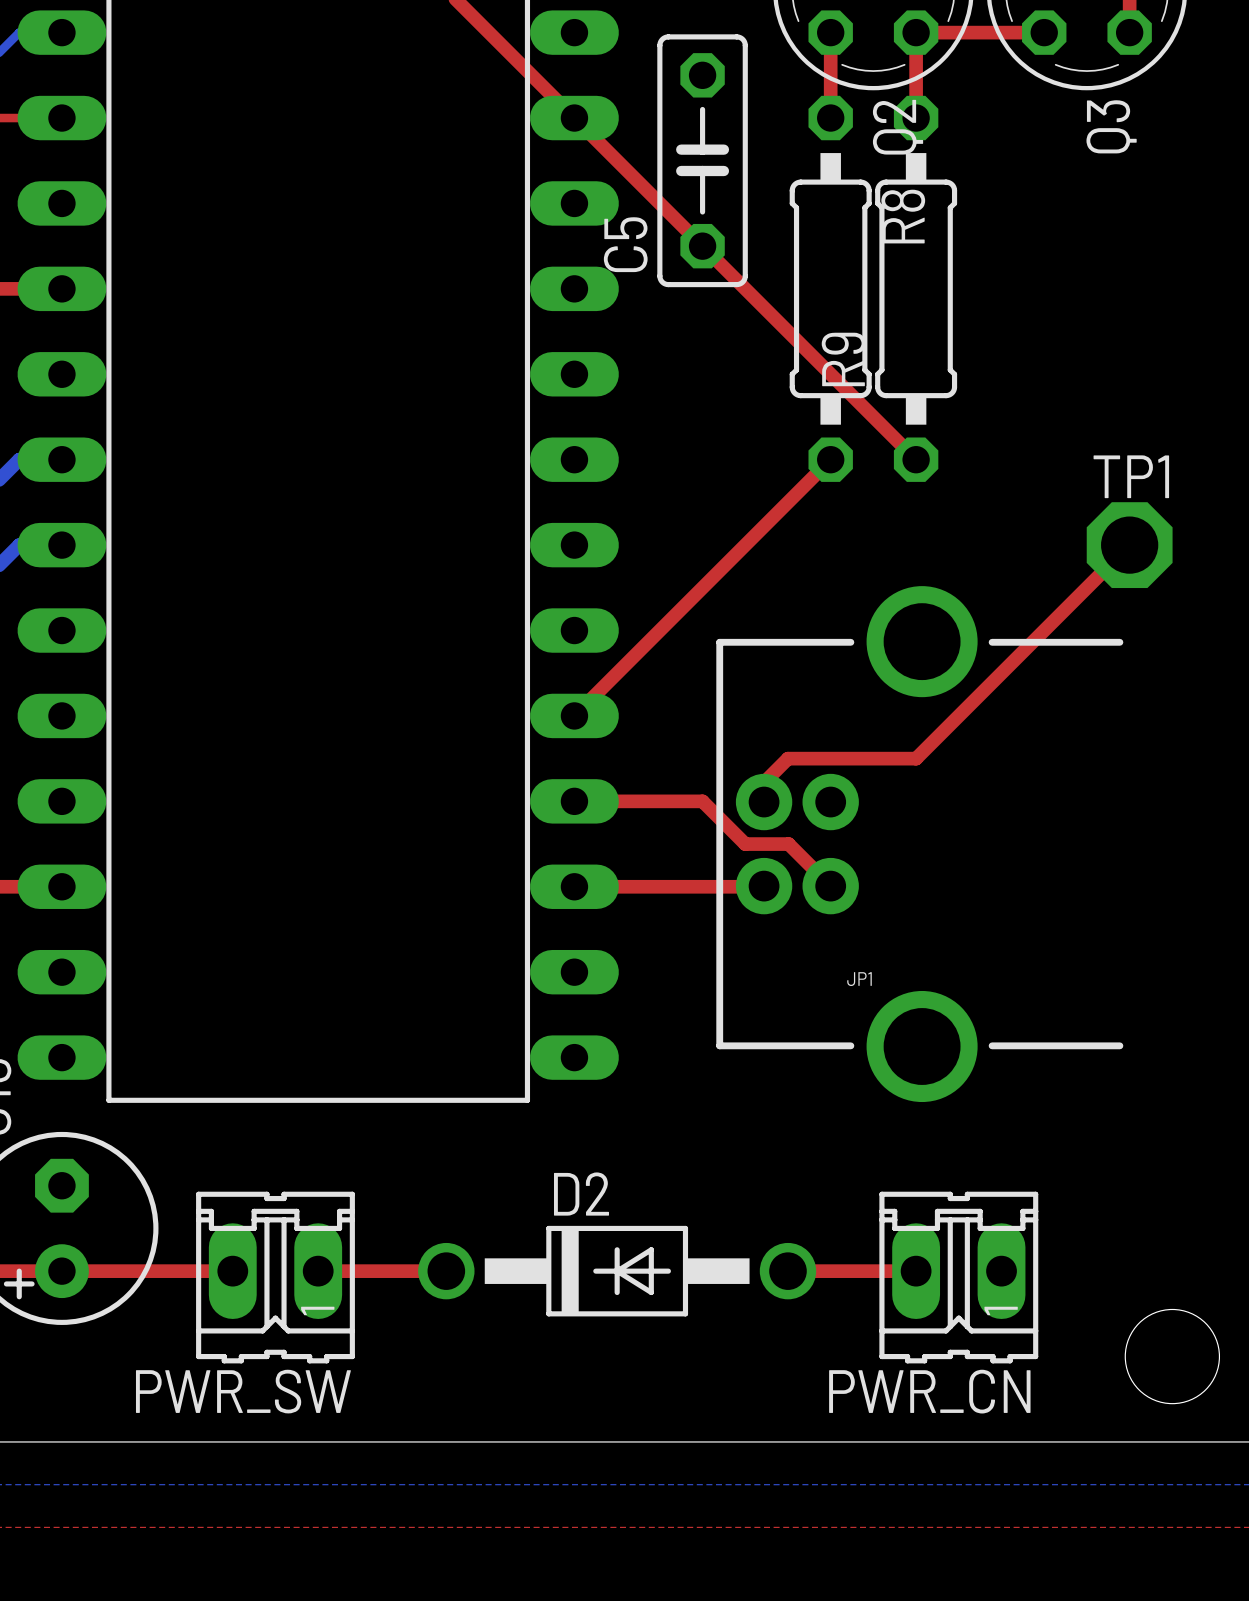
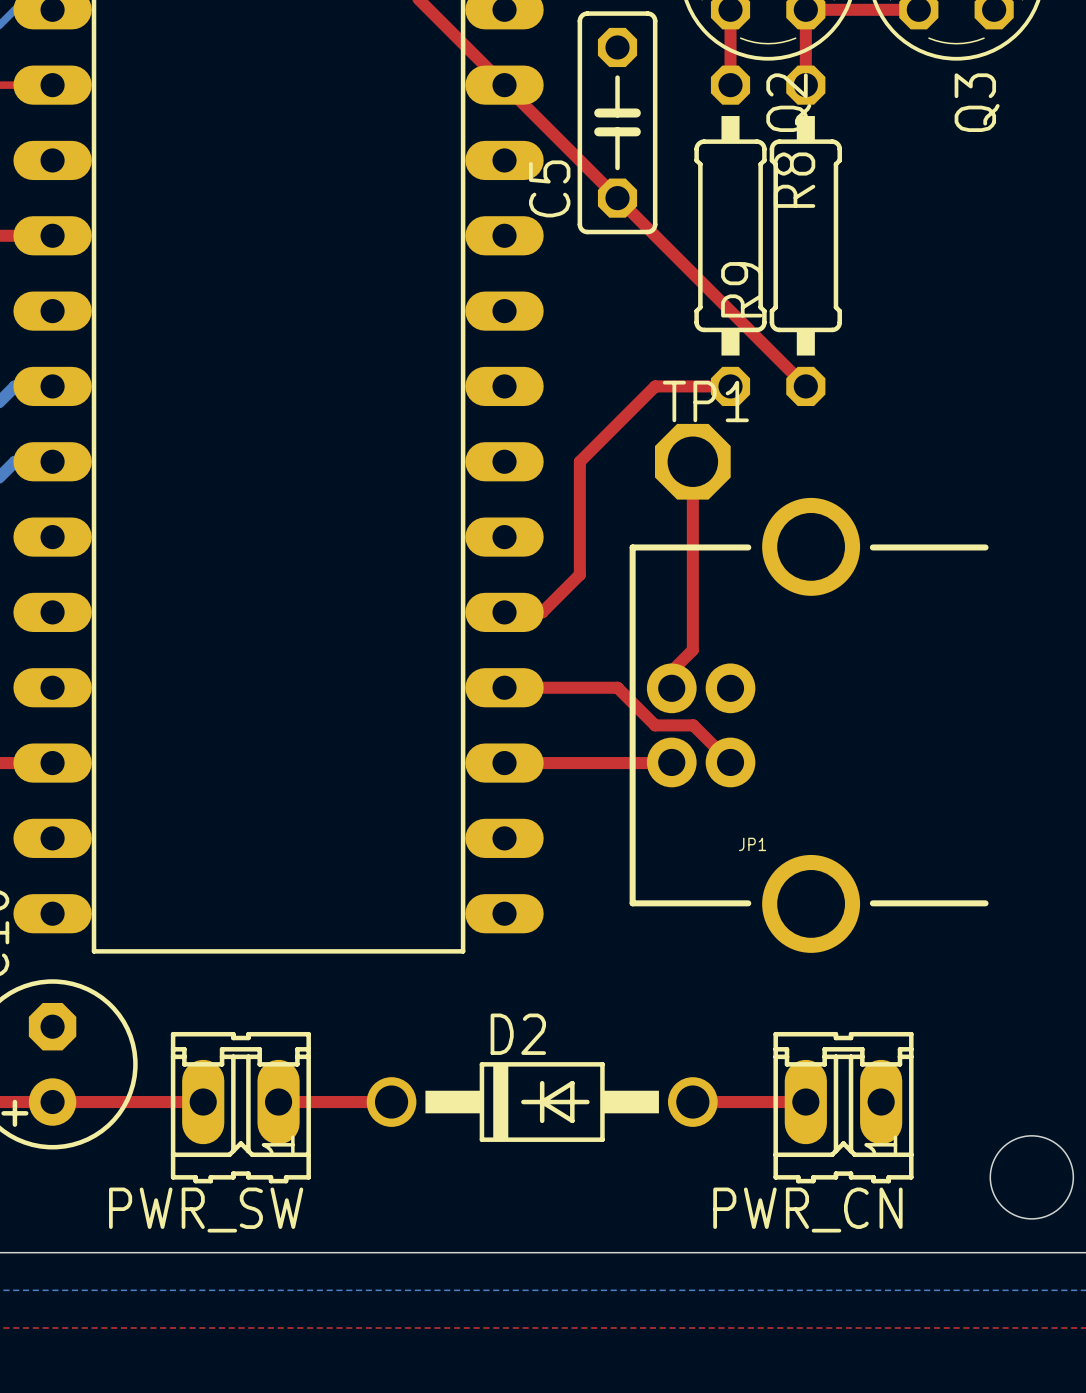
top track: (830, 459) (574, 715) -> (730, 386) (655, 386) (579, 461) (579, 574) (542, 612) (504, 612)
top track: (1129, 545) (916, 758) (787, 758) -> (692, 461) (692, 650)
TP1 position: (1129, 545) -> (692, 461)

